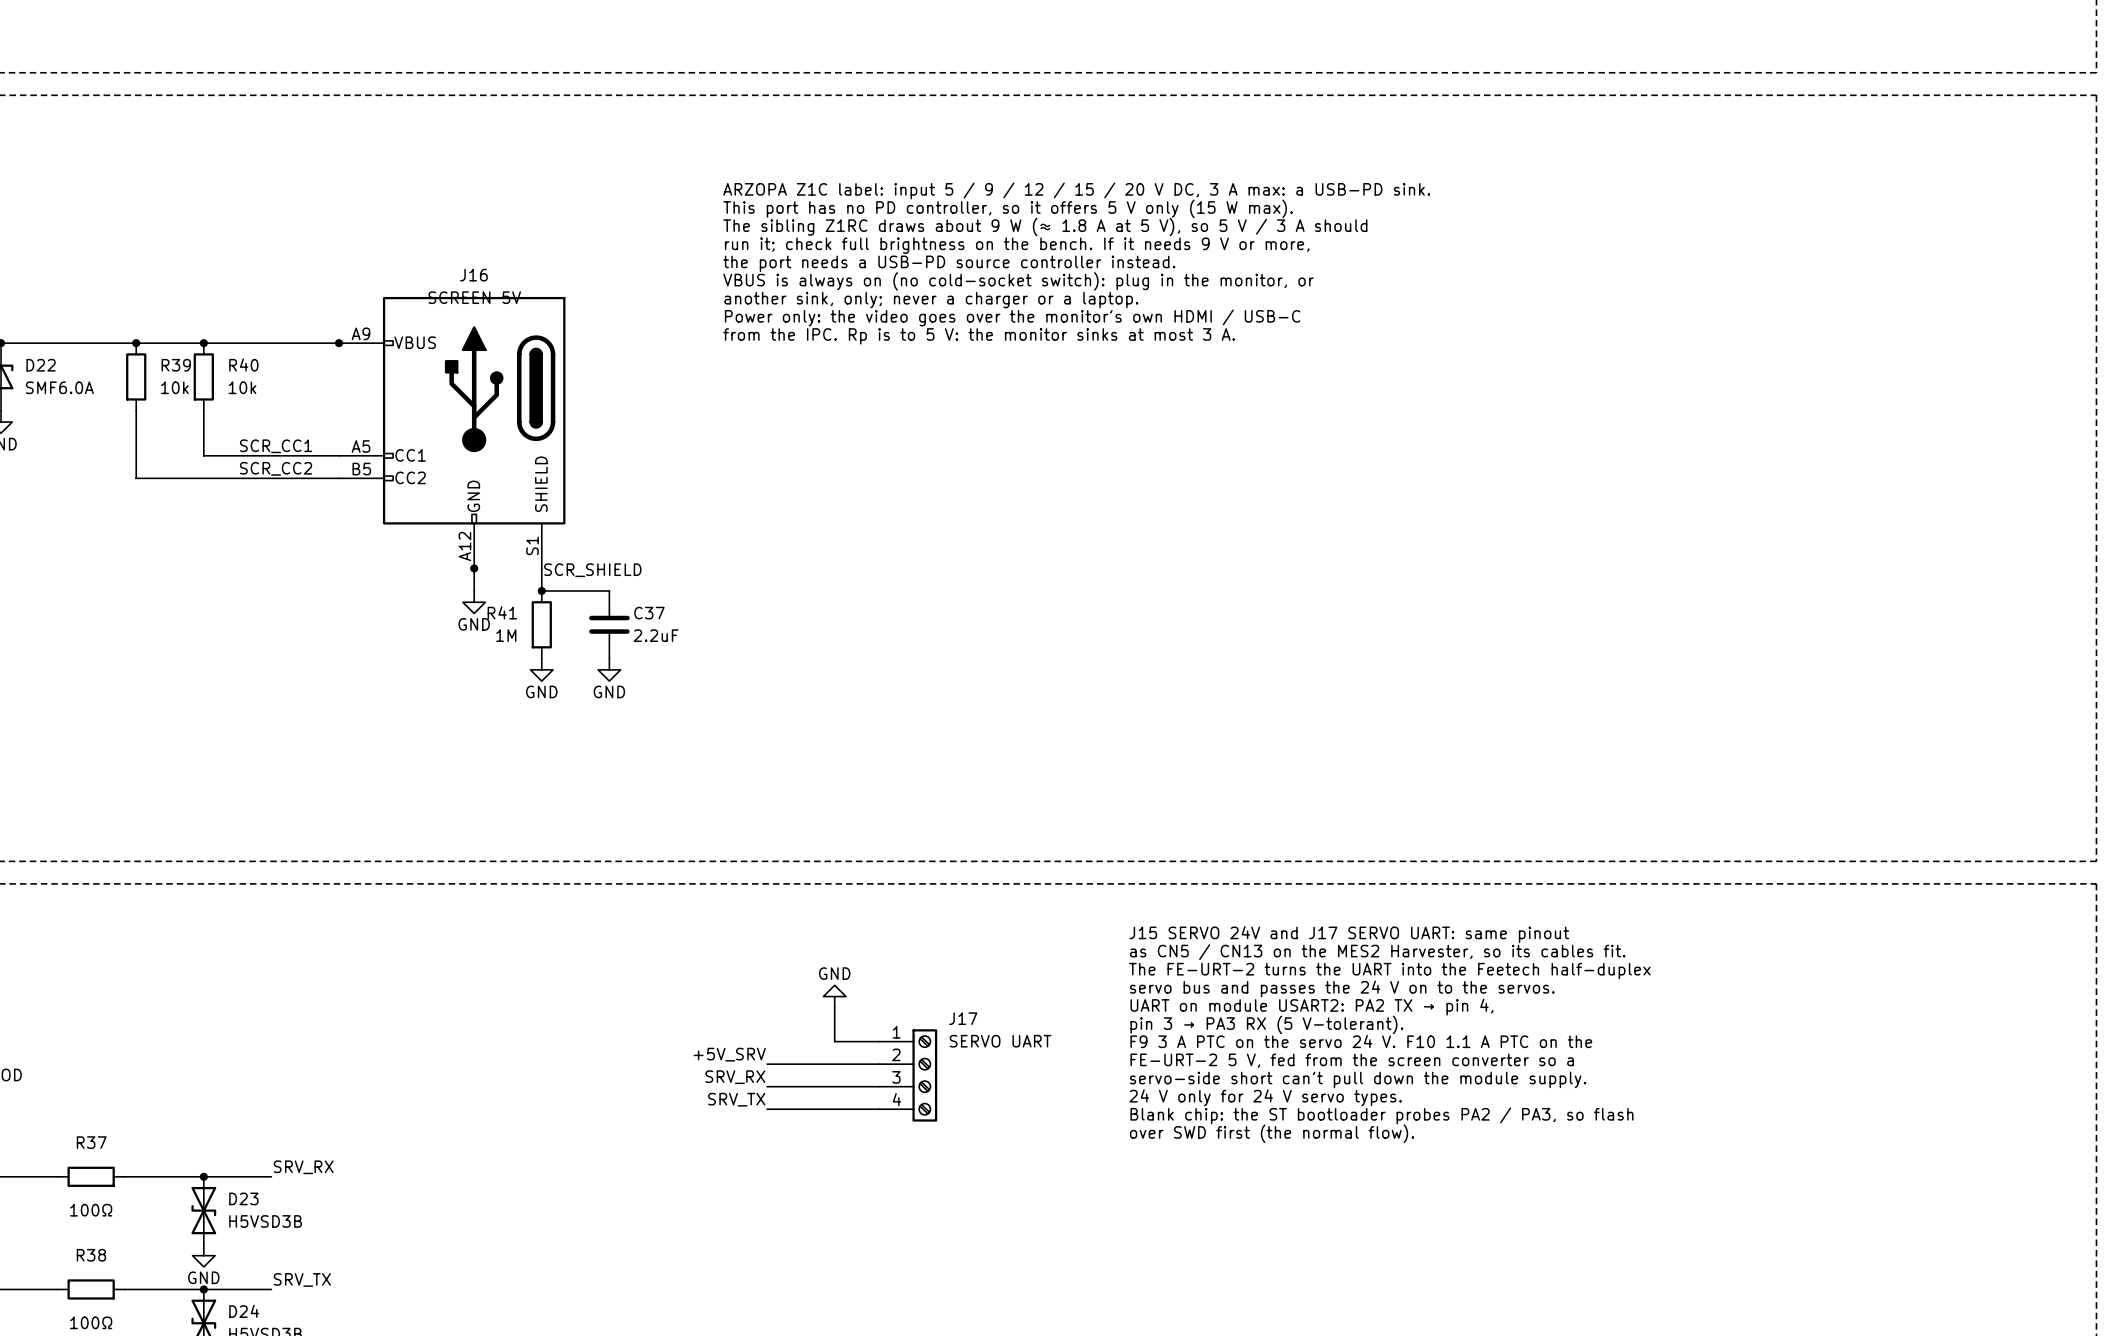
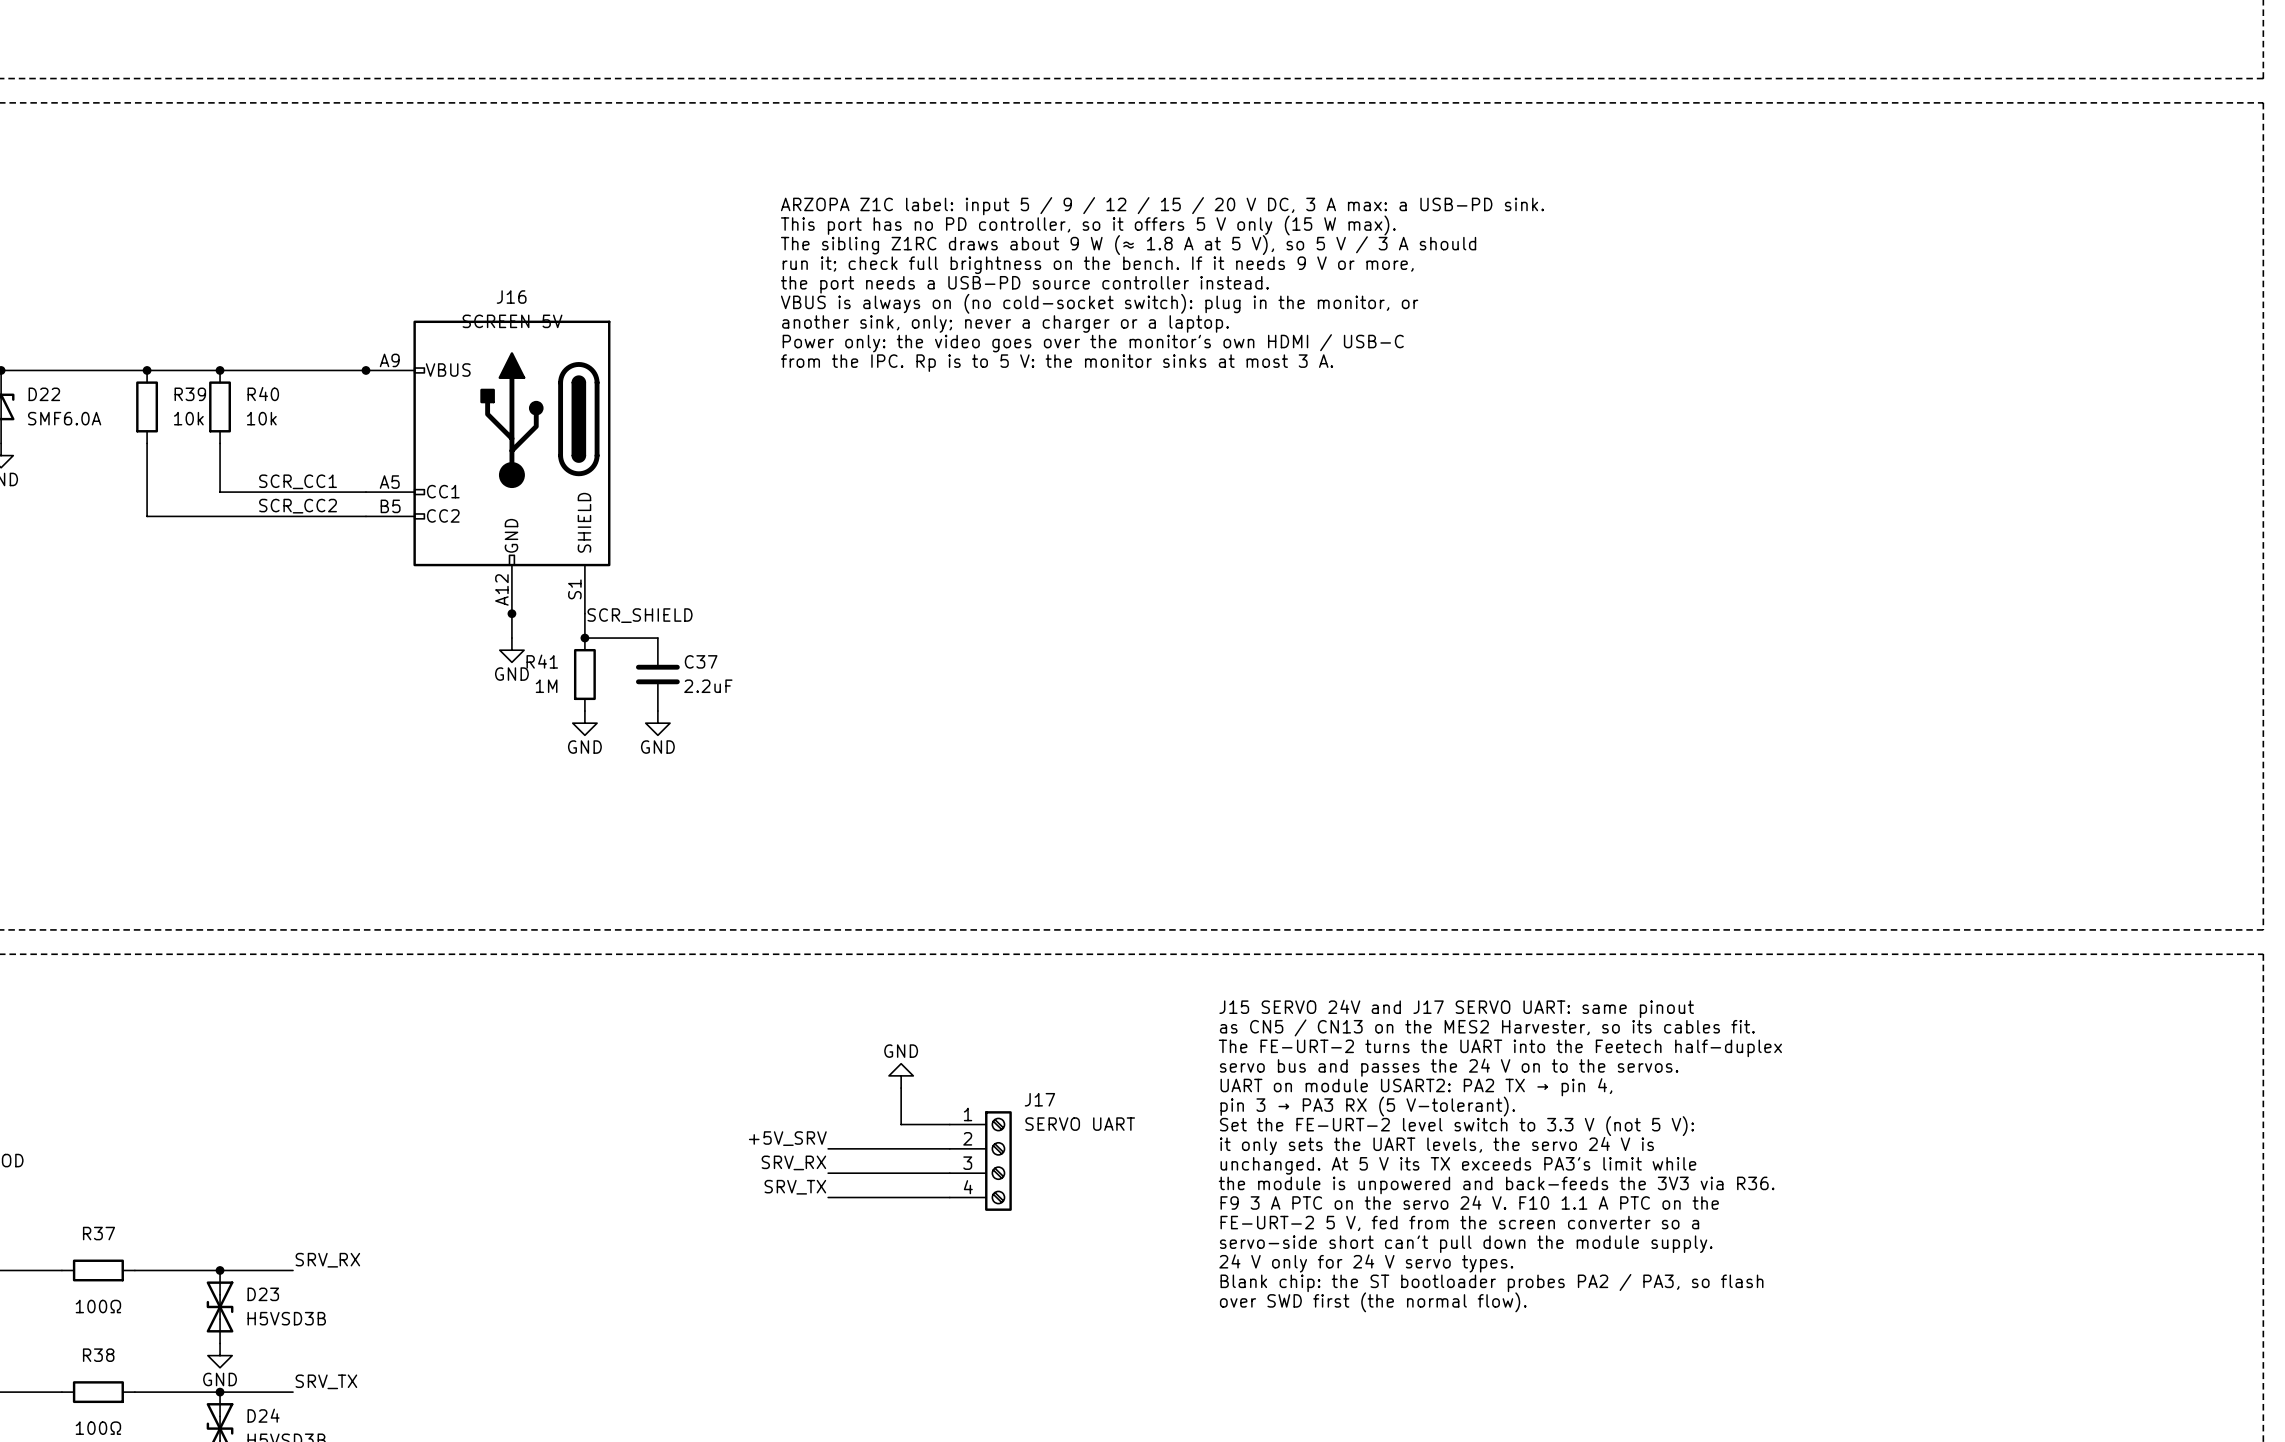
text: F9 3 A PTC on the servo 24 V. F10 1.1 A PTC on the (1361, 1041) -> Set the FE-URT-2 level switch to 3.3 V (not 5 V): (1456, 1126)
text: FE-URT-2 5 V, fed from the screen converter so a (1352, 1060) -> it only sets the UART levels, the servo 24 V is (1436, 1145)
text: servo-side short can't pull down the module supply. (1358, 1079) -> unchanged. At 5 V its TX exceeds PA3's limit while (1458, 1165)
text: 24 V only for 24 V servo types. (1265, 1097) -> the module is unpowered and back-feeds the 3V3 via R36. (1496, 1185)
text: Blank chip: the ST bootloader probes PA2 / PA3, so flash (1381, 1115) -> F9 3 A PTC on the servo 24 V. F10 1.1 A PTC on the (1469, 1202)
text: over SWD first (the normal flow). (1272, 1133) -> FE-URT-2 5 V, fed from the screen converter so a (1459, 1223)
text: none -> servo-side short can't pull down the module supply. (1466, 1244)
text: none -> 24 V only for 24 V servo types. (1366, 1263)
text: none -> Blank chip: the ST bootloader probes PA2 / PA3, so flash (1491, 1283)
text: none -> over SWD first (the normal flow). (1373, 1302)

